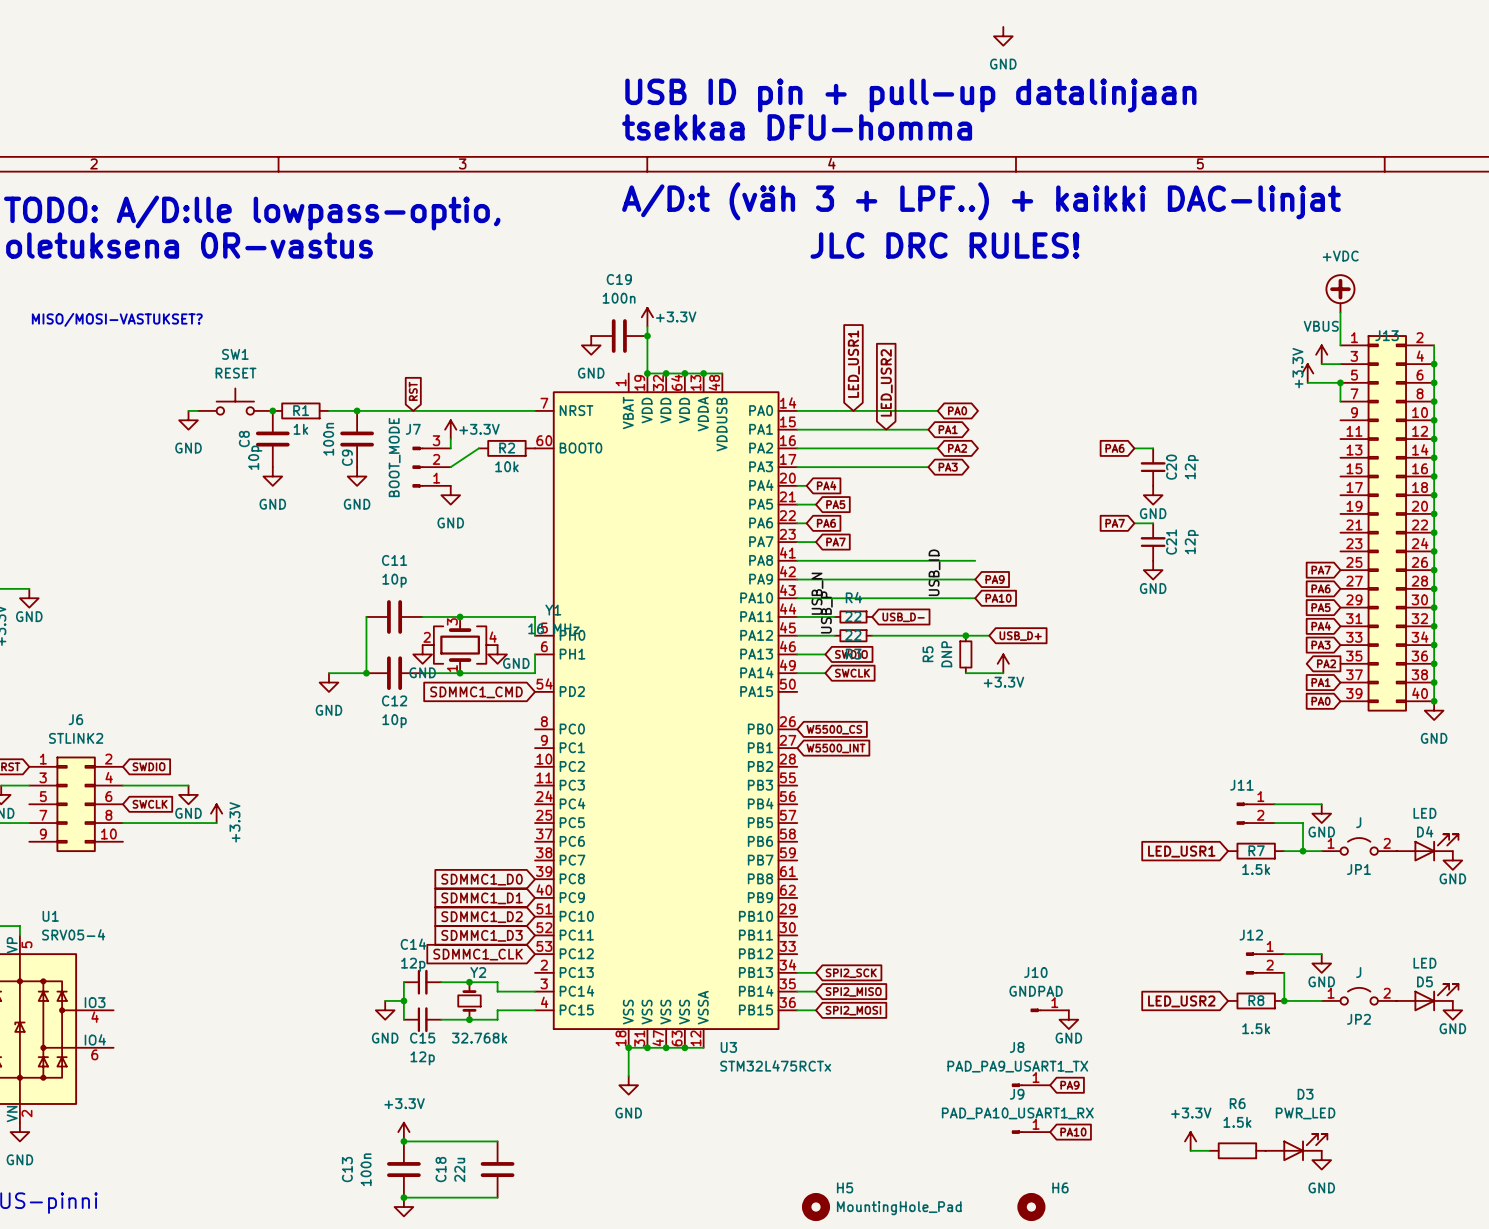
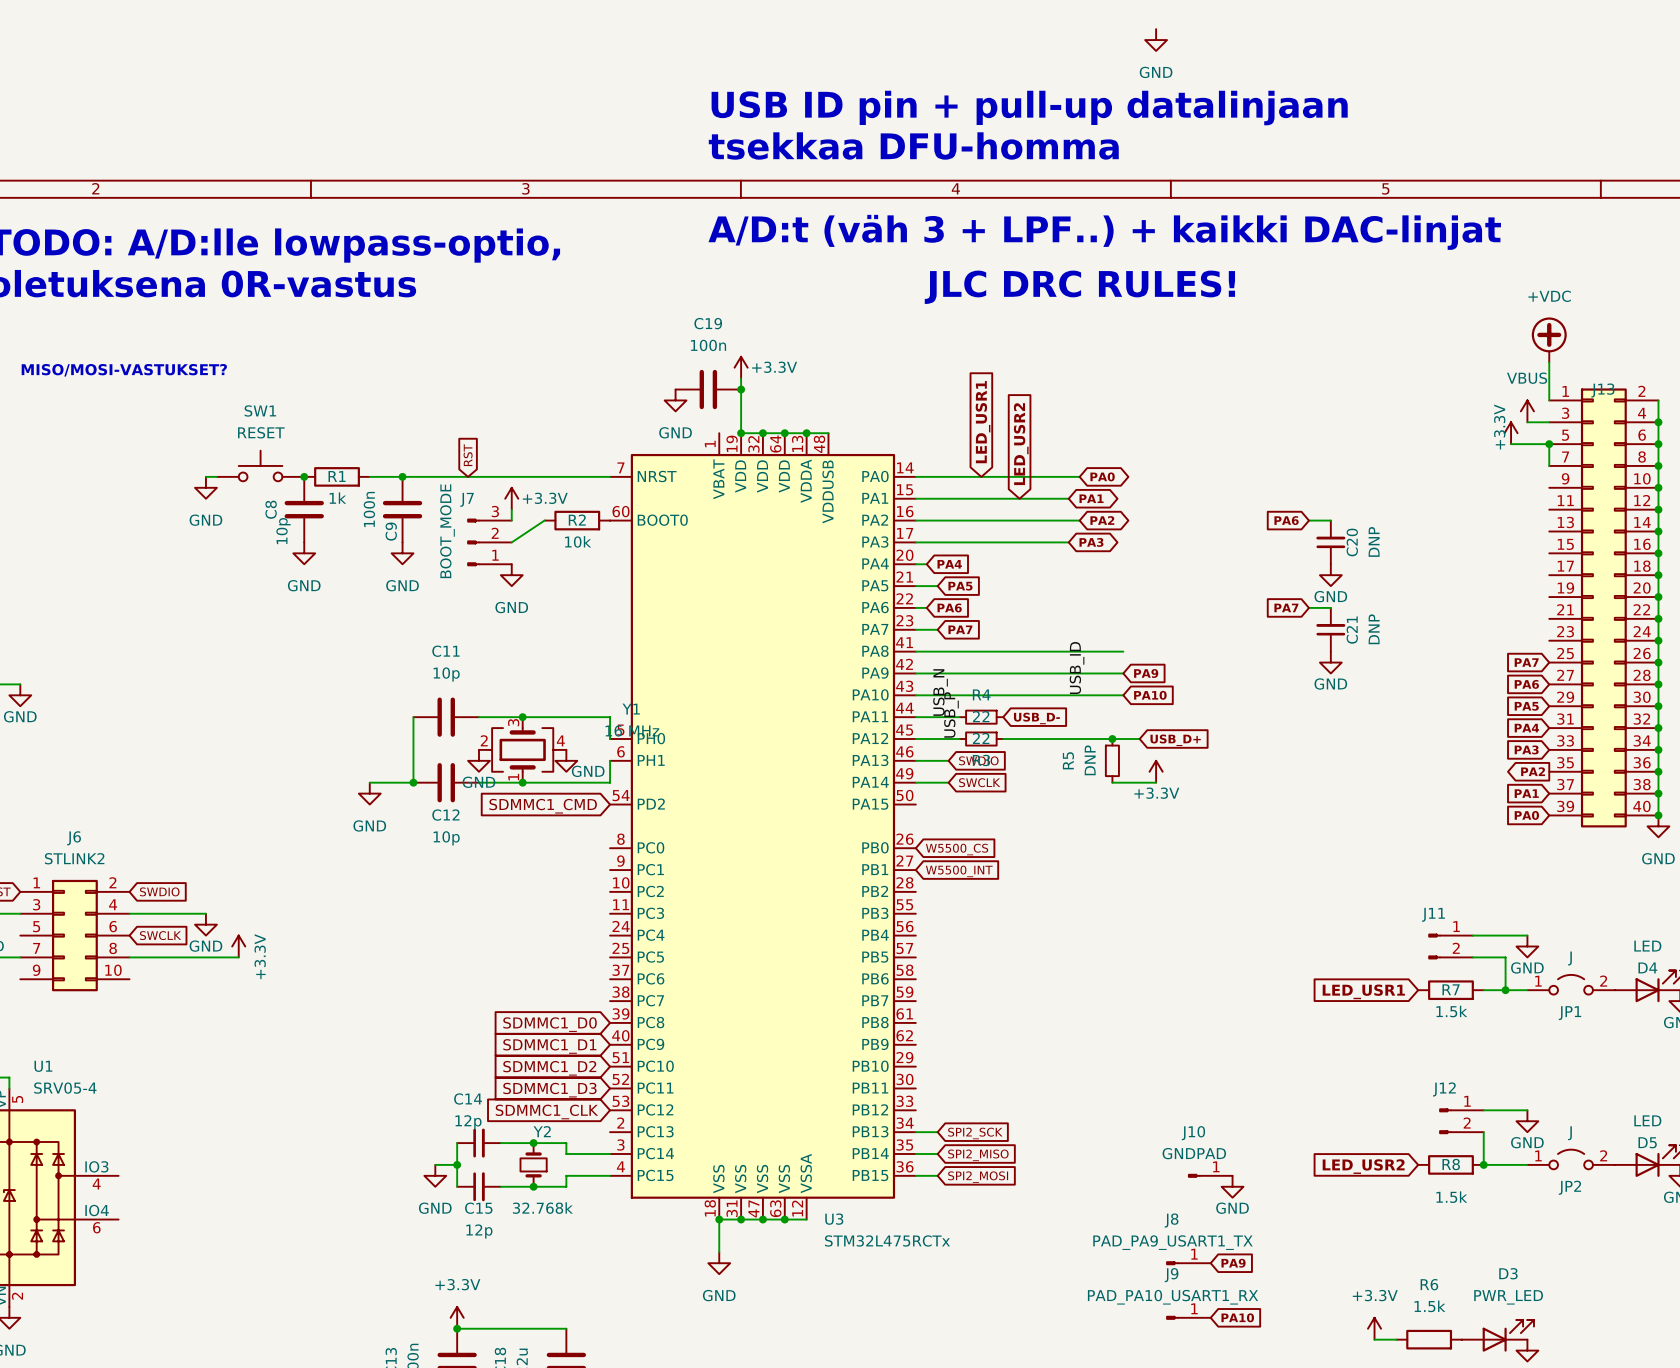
C20 value: 12p (1191, 467) -> DNP (1374, 541)
C21 value: 12p (1191, 542) -> DNP (1374, 629)

